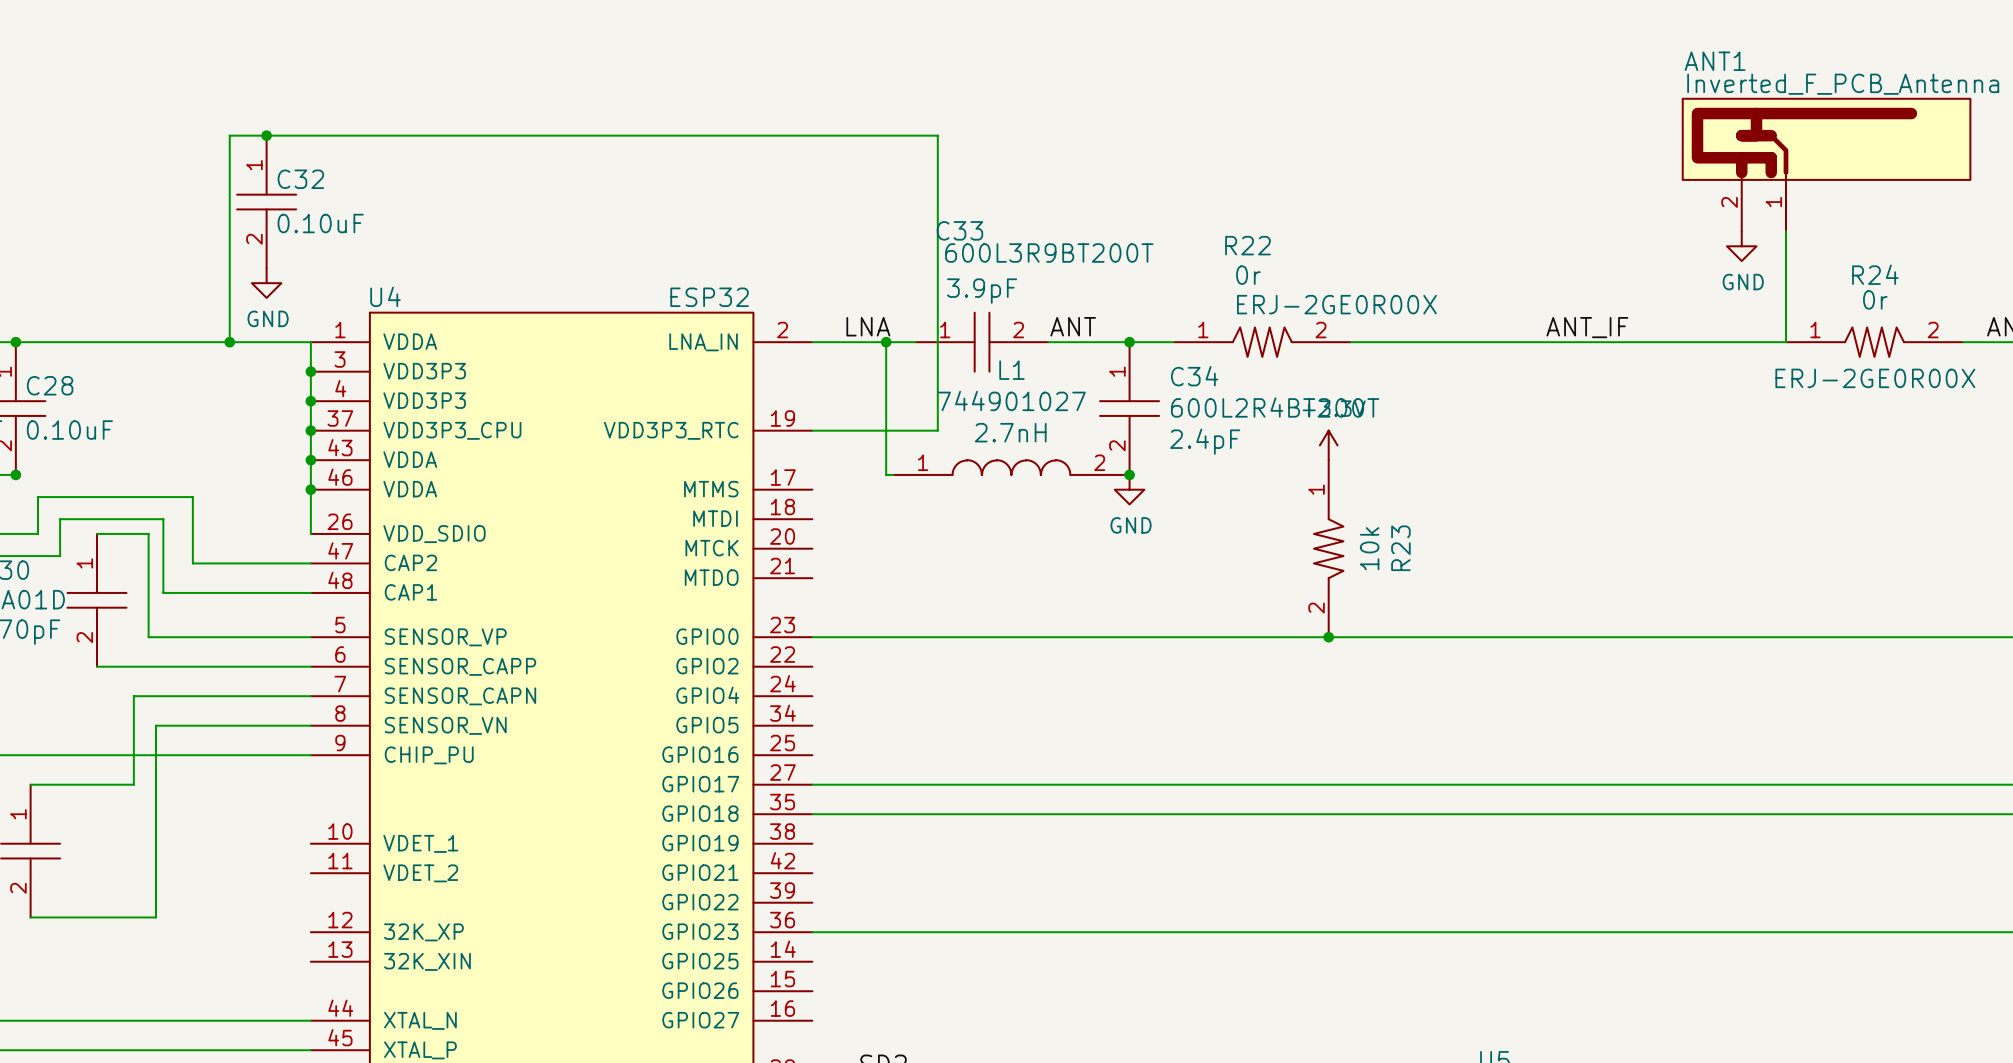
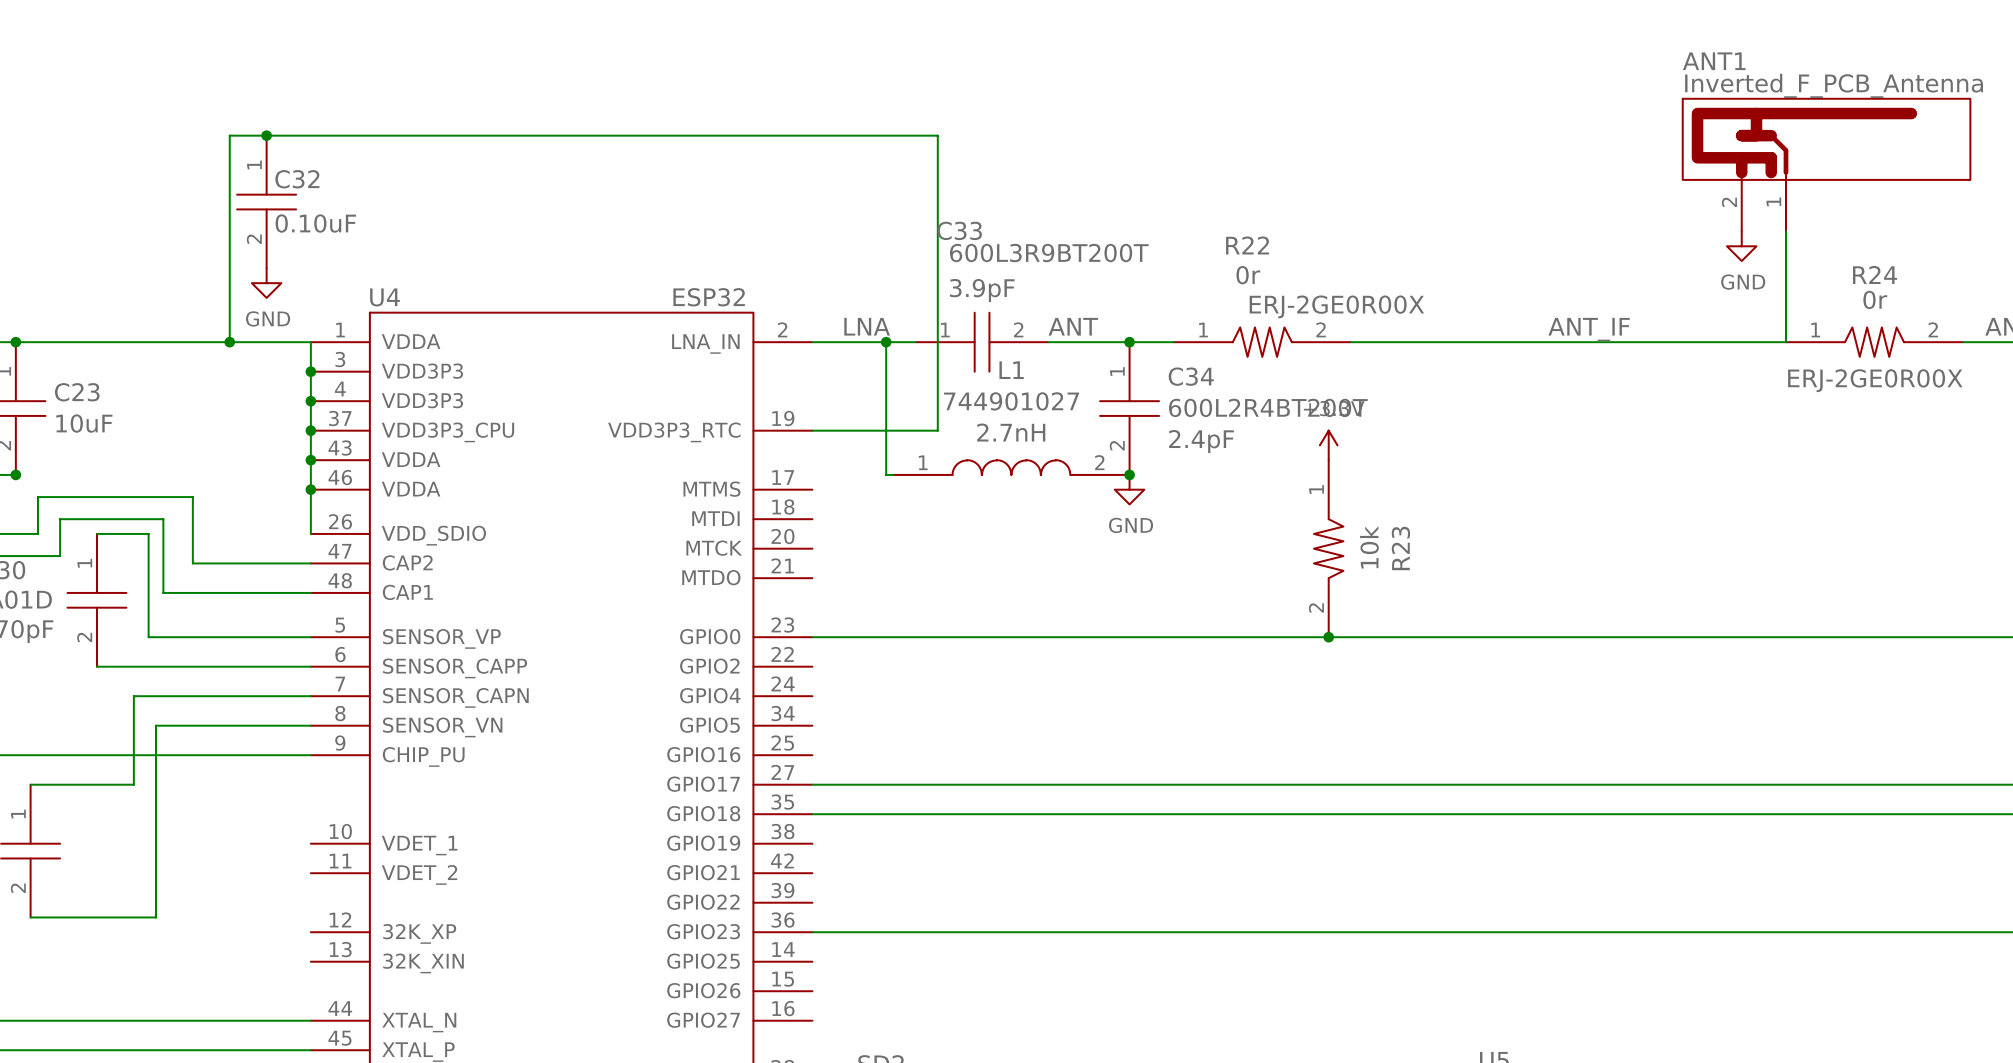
C28 name: C28 (50, 385) -> C23 (77, 392)
C28 text: none -> 10uF (84, 423)
C28 text: 0.10uF (69, 430) -> none

